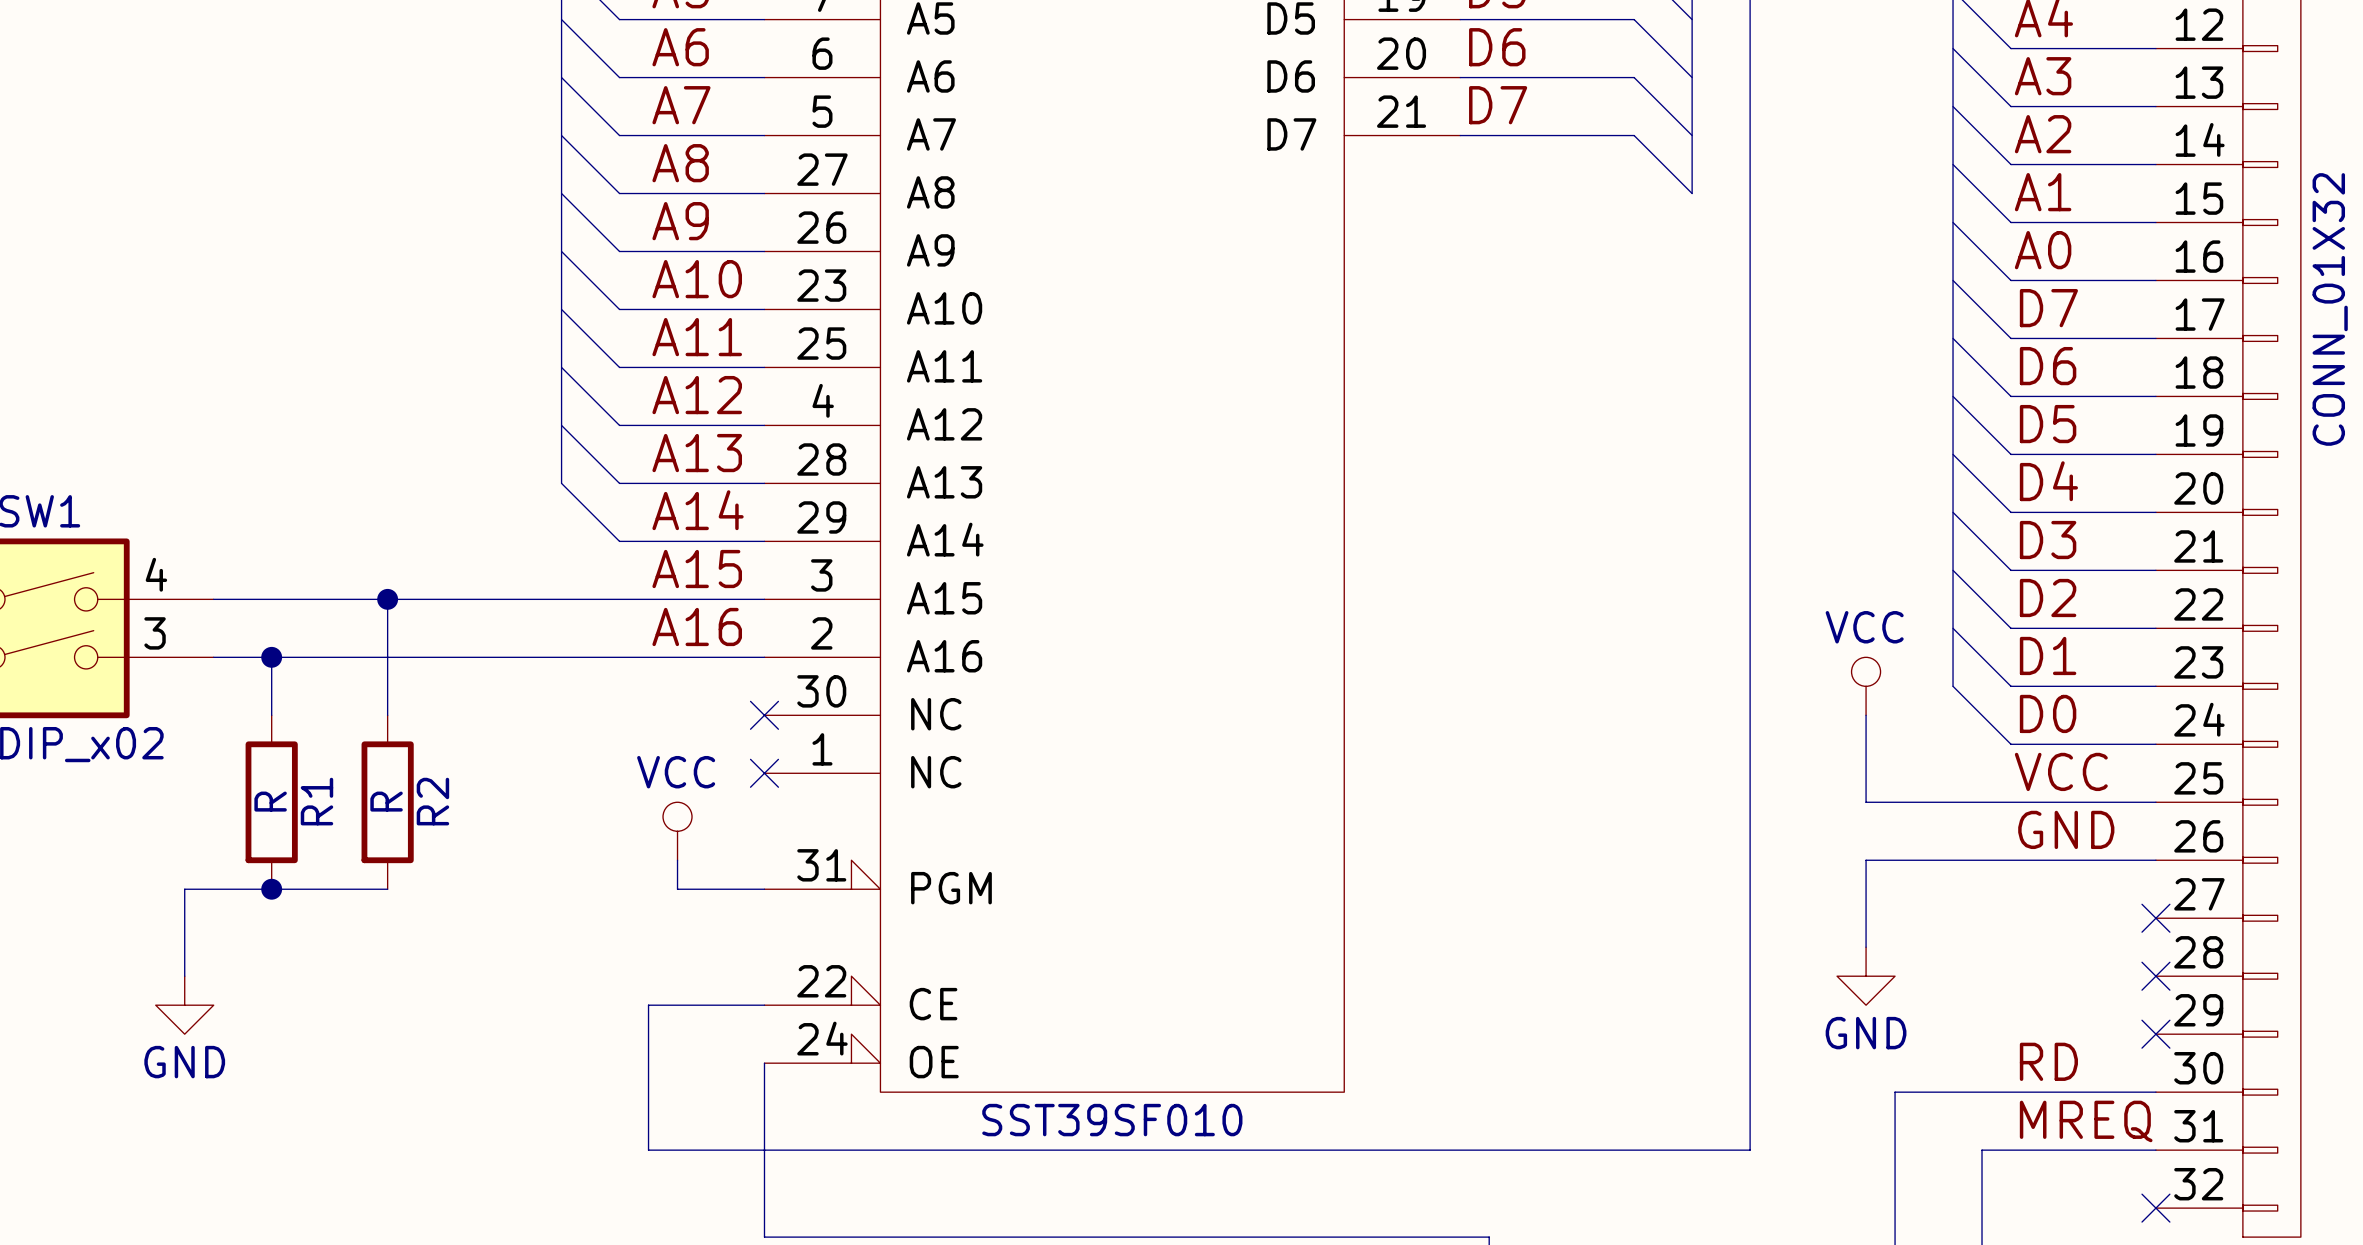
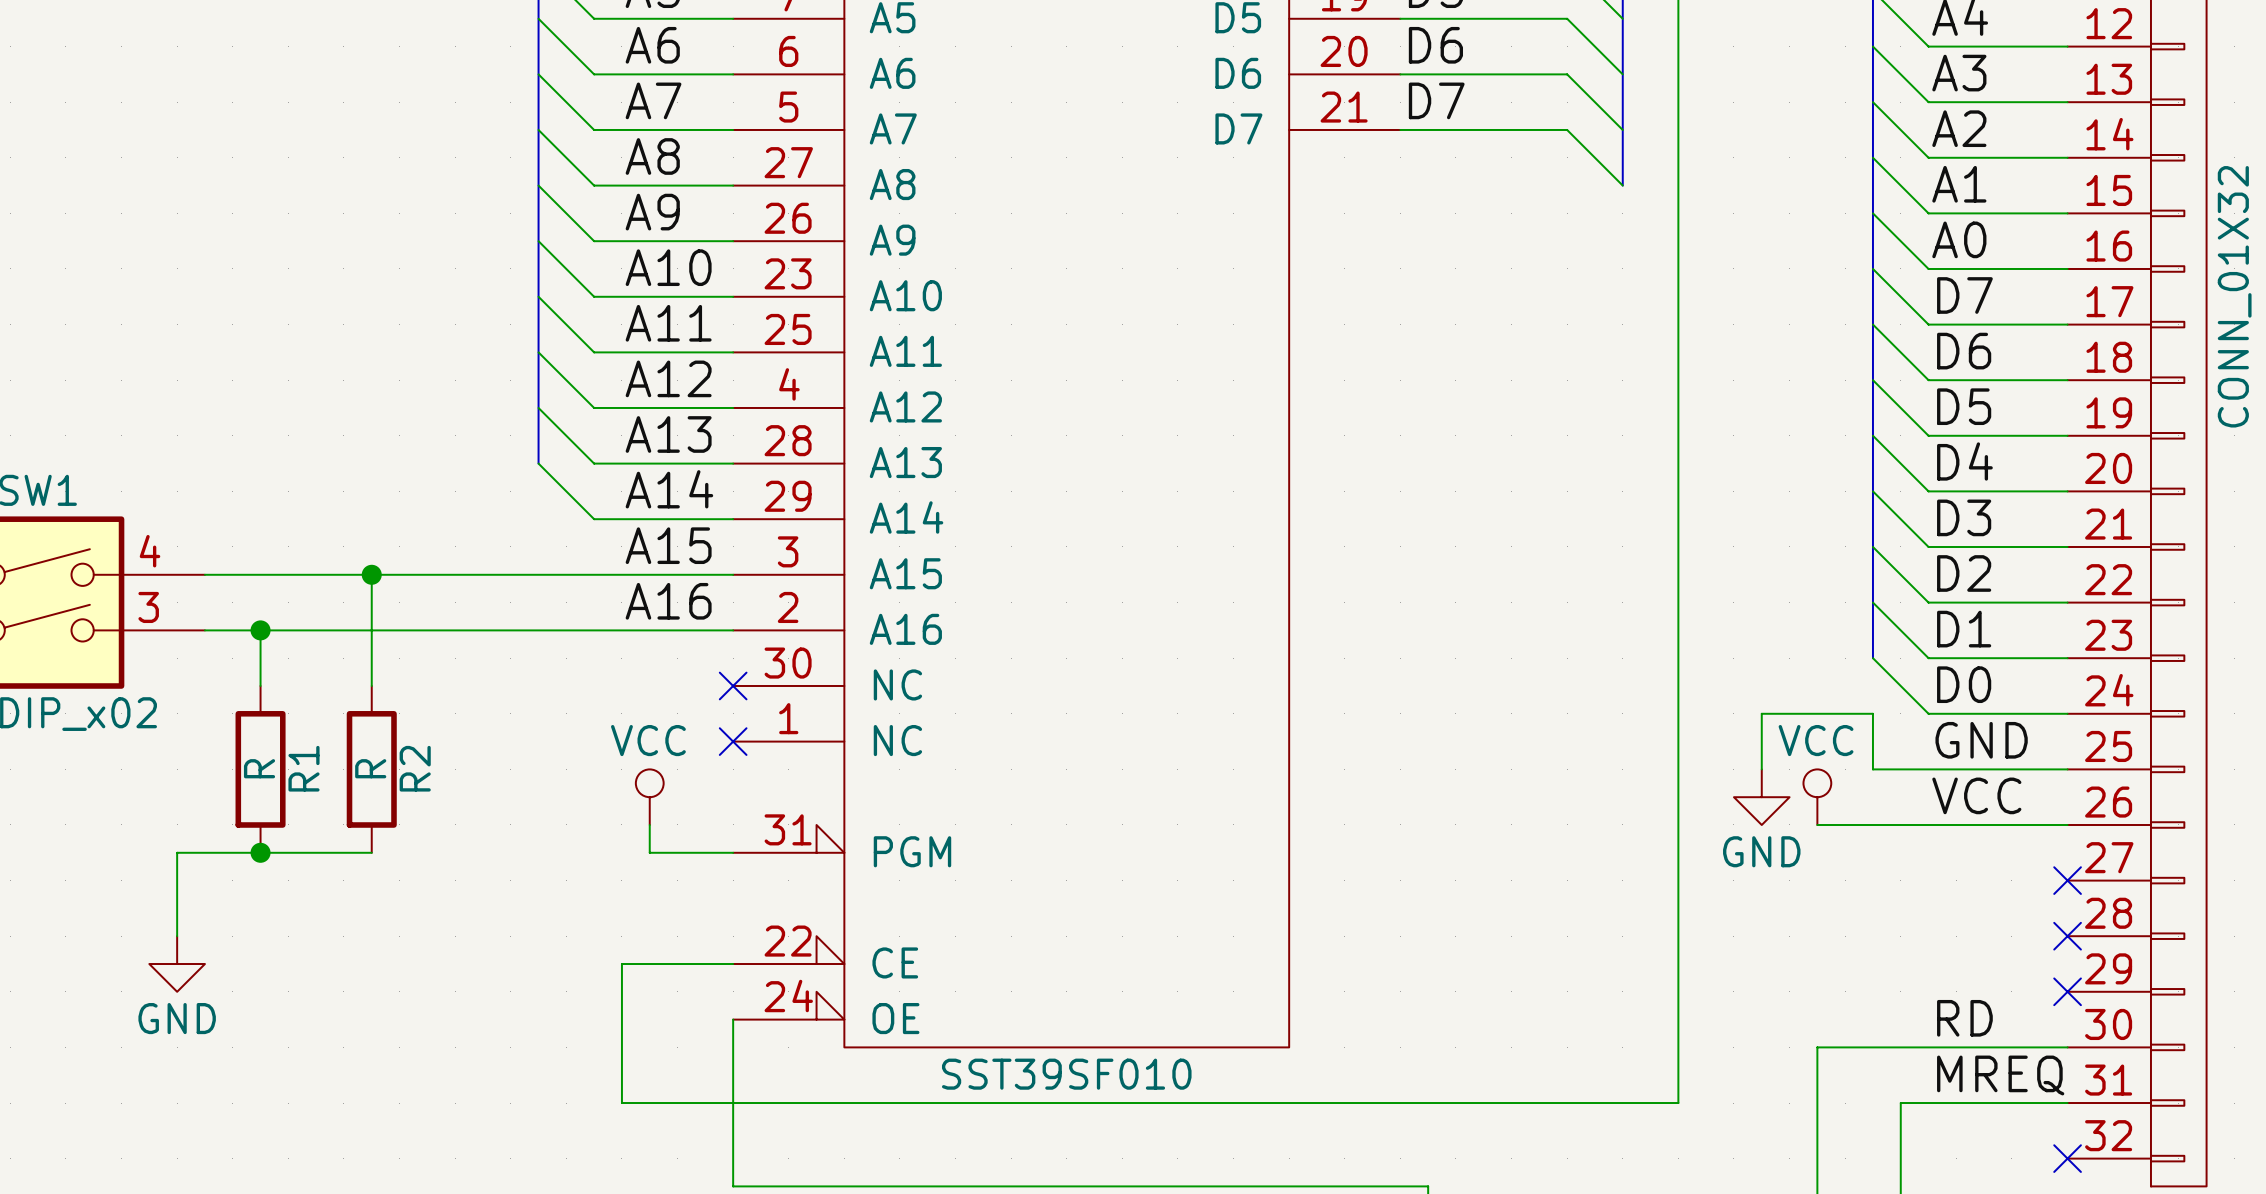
power symbol position: VCC (1866, 686) -> VCC (1817, 797)
wire: (1866, 715) (1866, 802) (1953, 802) -> (1761, 769) (1761, 713) (1872, 713) (1872, 769)
label: VCC (2061, 771) -> GND (1981, 740)
label: GND (2066, 829) -> VCC (1976, 795)
wire: (1895, 860) (1866, 860) (1866, 947) -> none
power symbol position: GND (1866, 976) -> GND (1761, 797)

